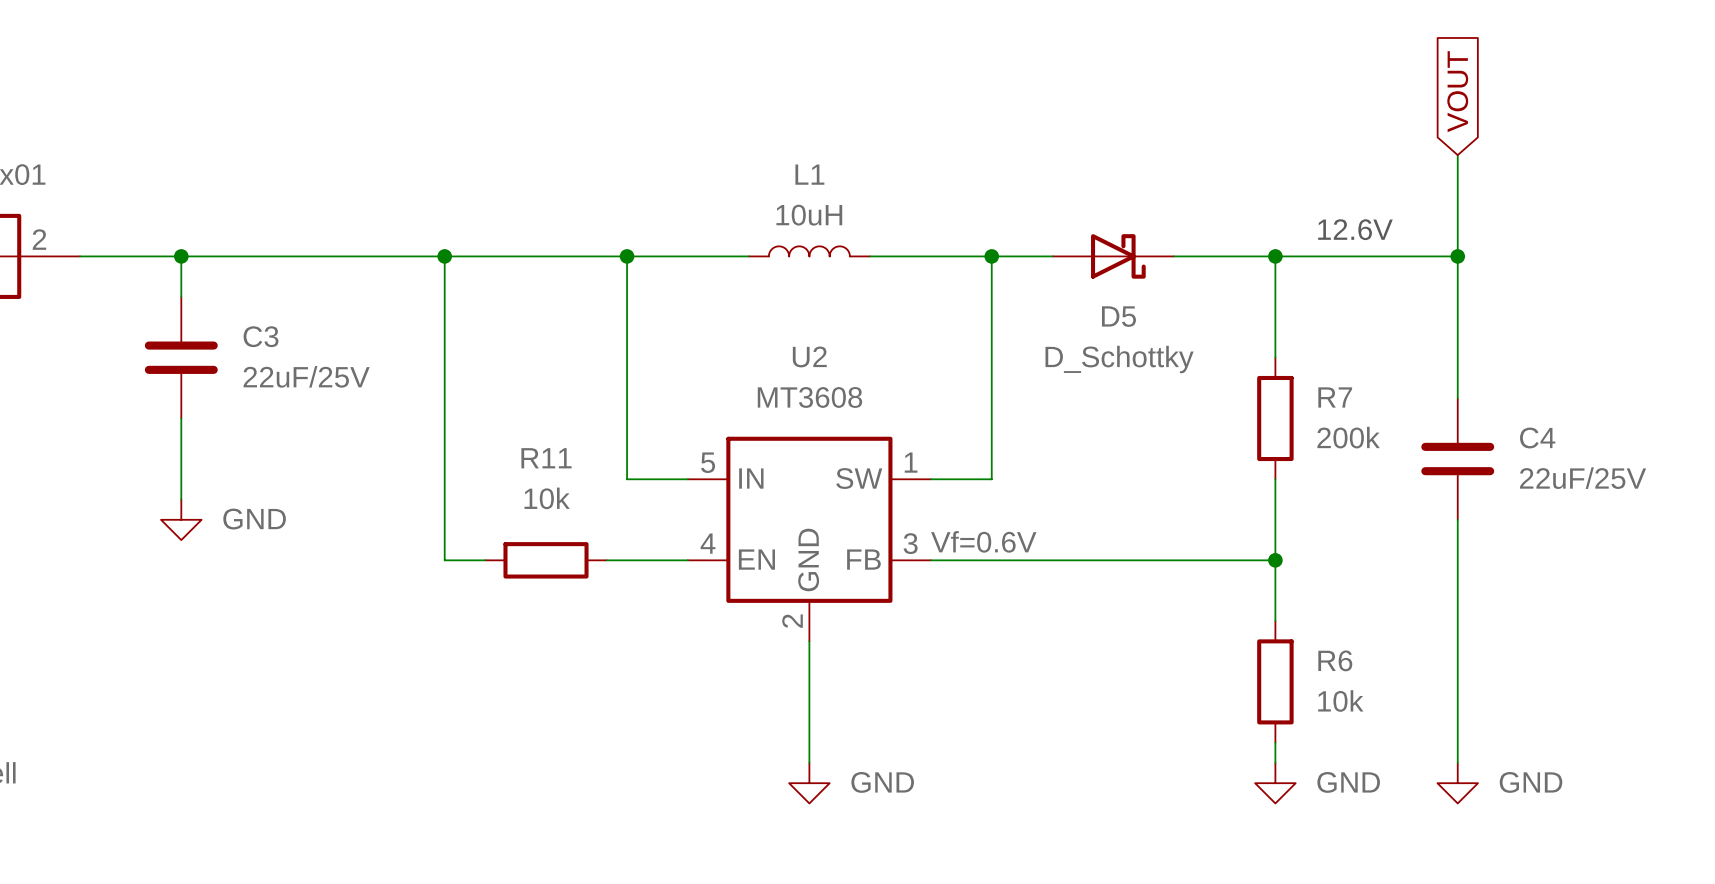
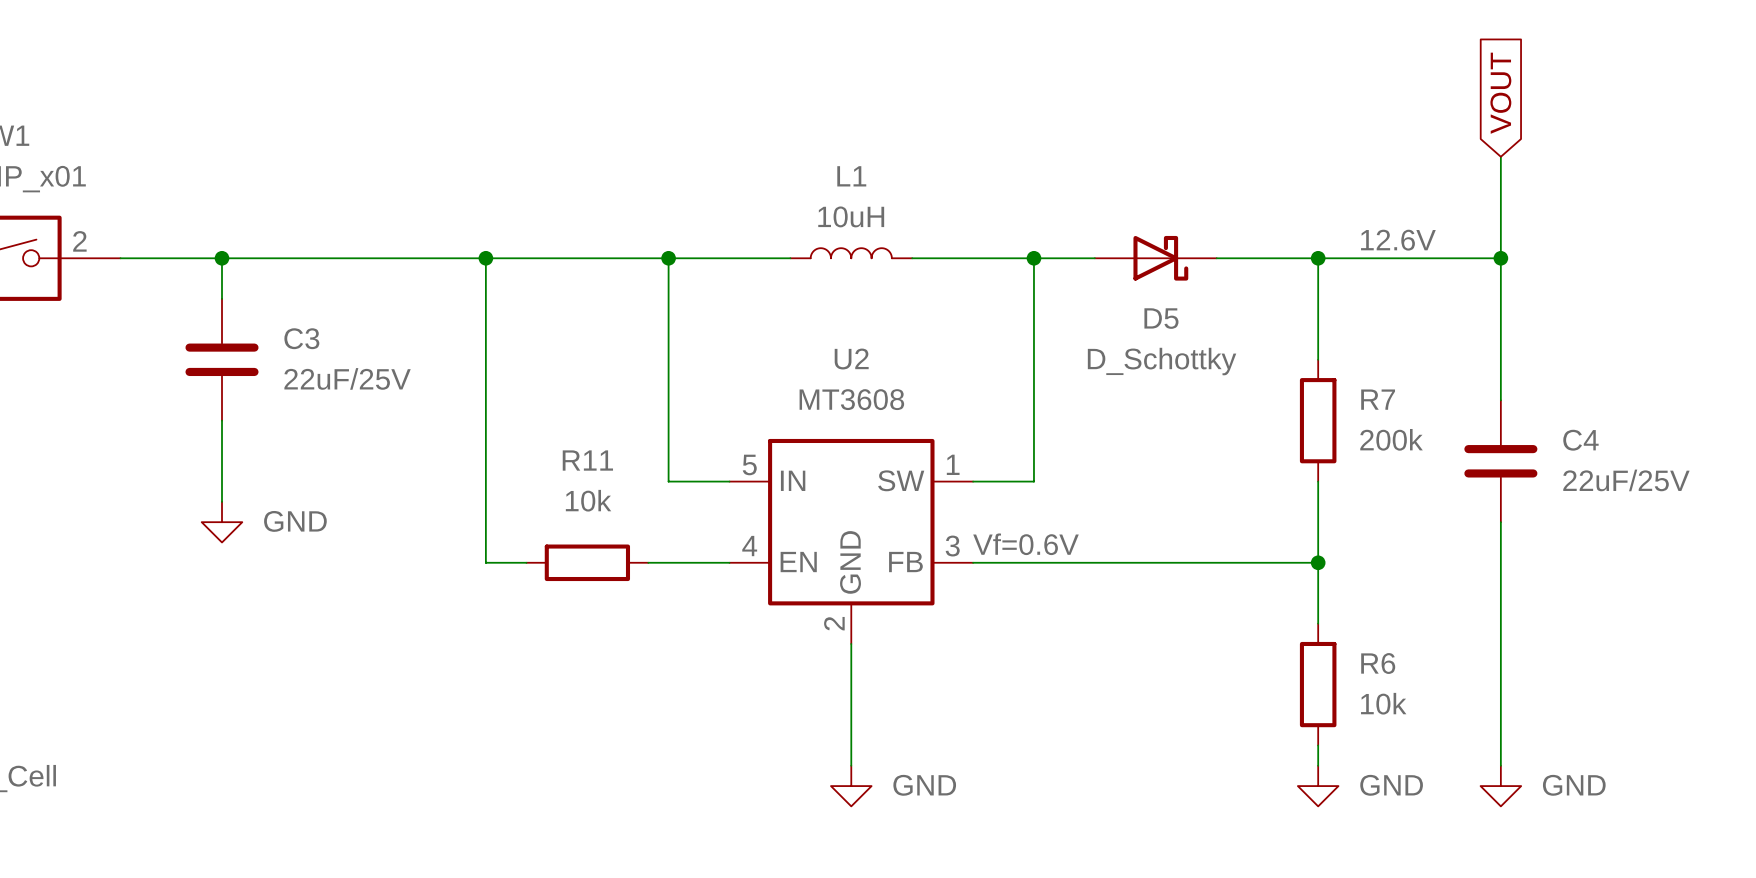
text: 12.6V (1355, 229) -> none
label: none -> 12.6V (1398, 240)

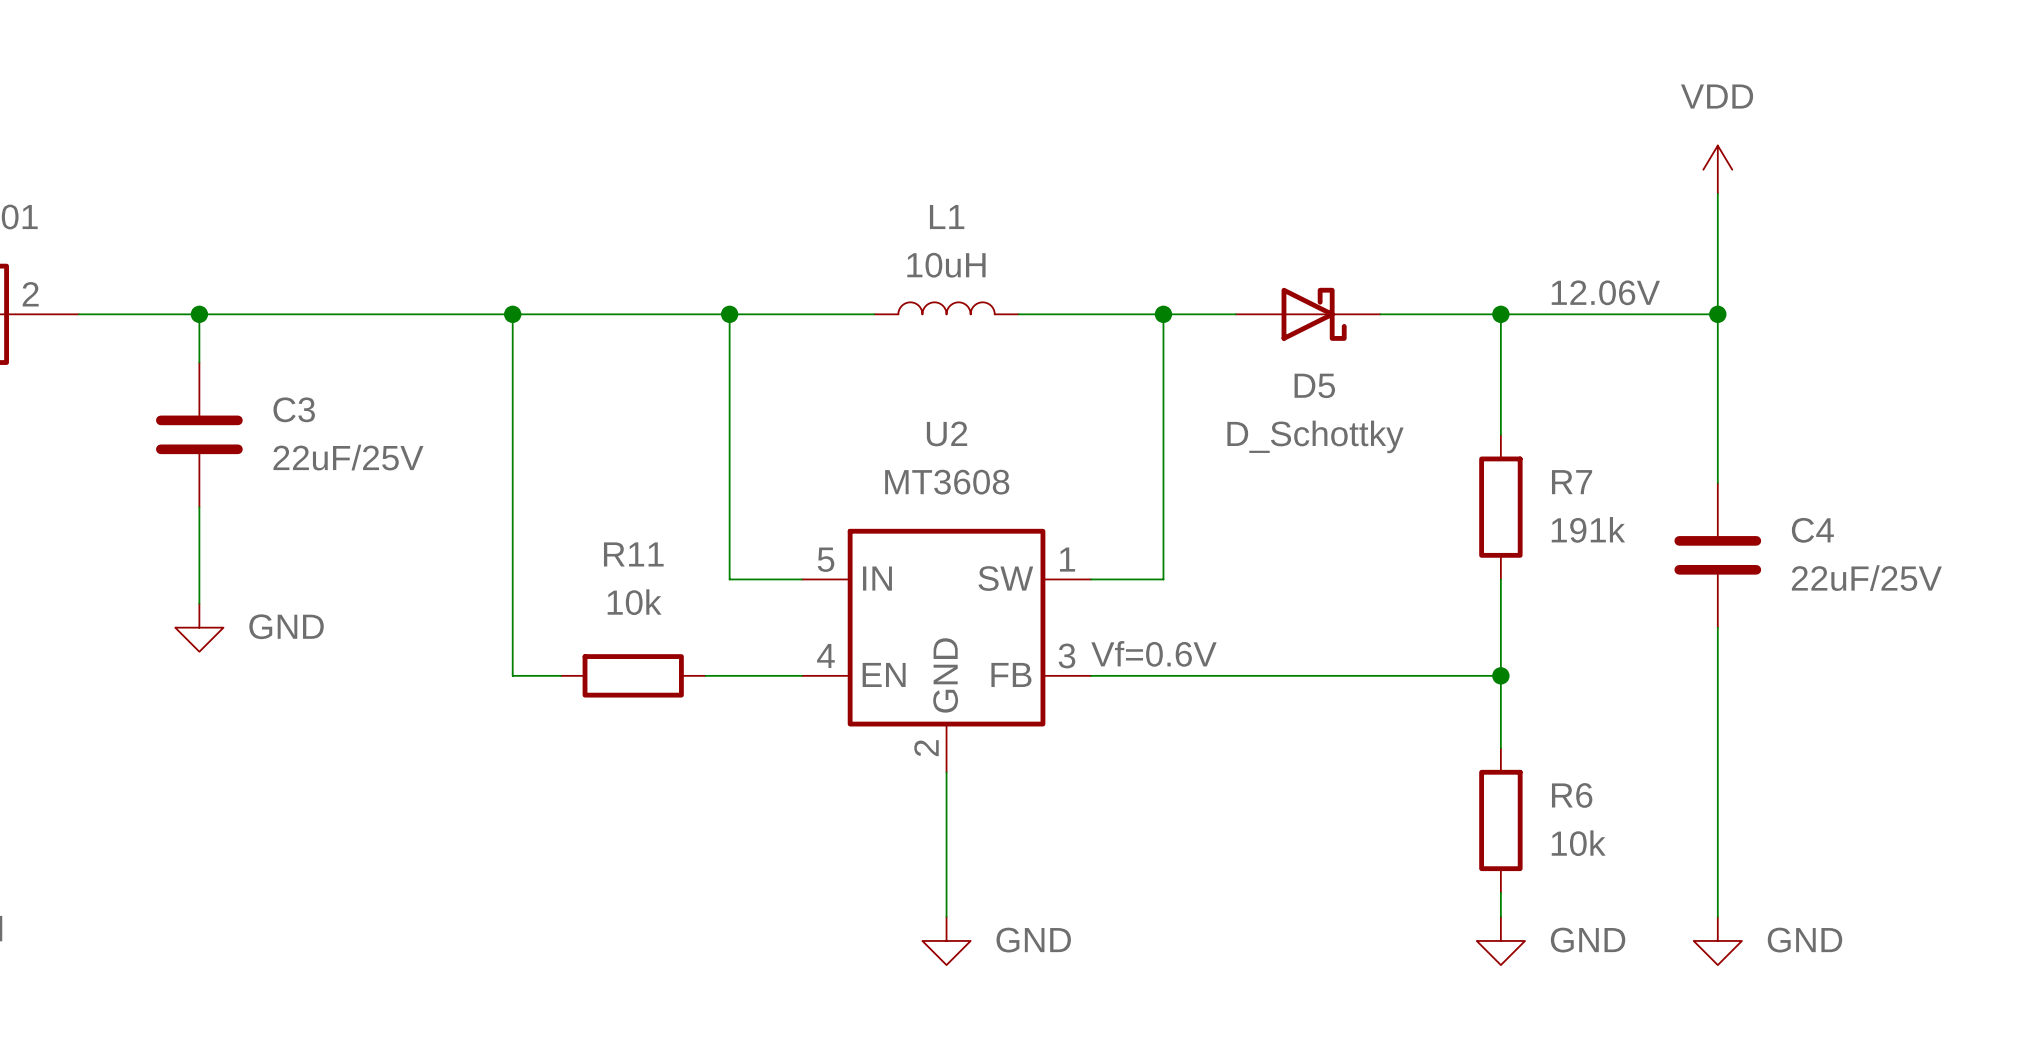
global label: VOUT (1500, 93) -> none
power symbol: none -> VDD (1717, 169)
label: 12.6V (1398, 240) -> 12.06V (1605, 292)
R7 value: 200k (1391, 439) -> 191k (1588, 529)

